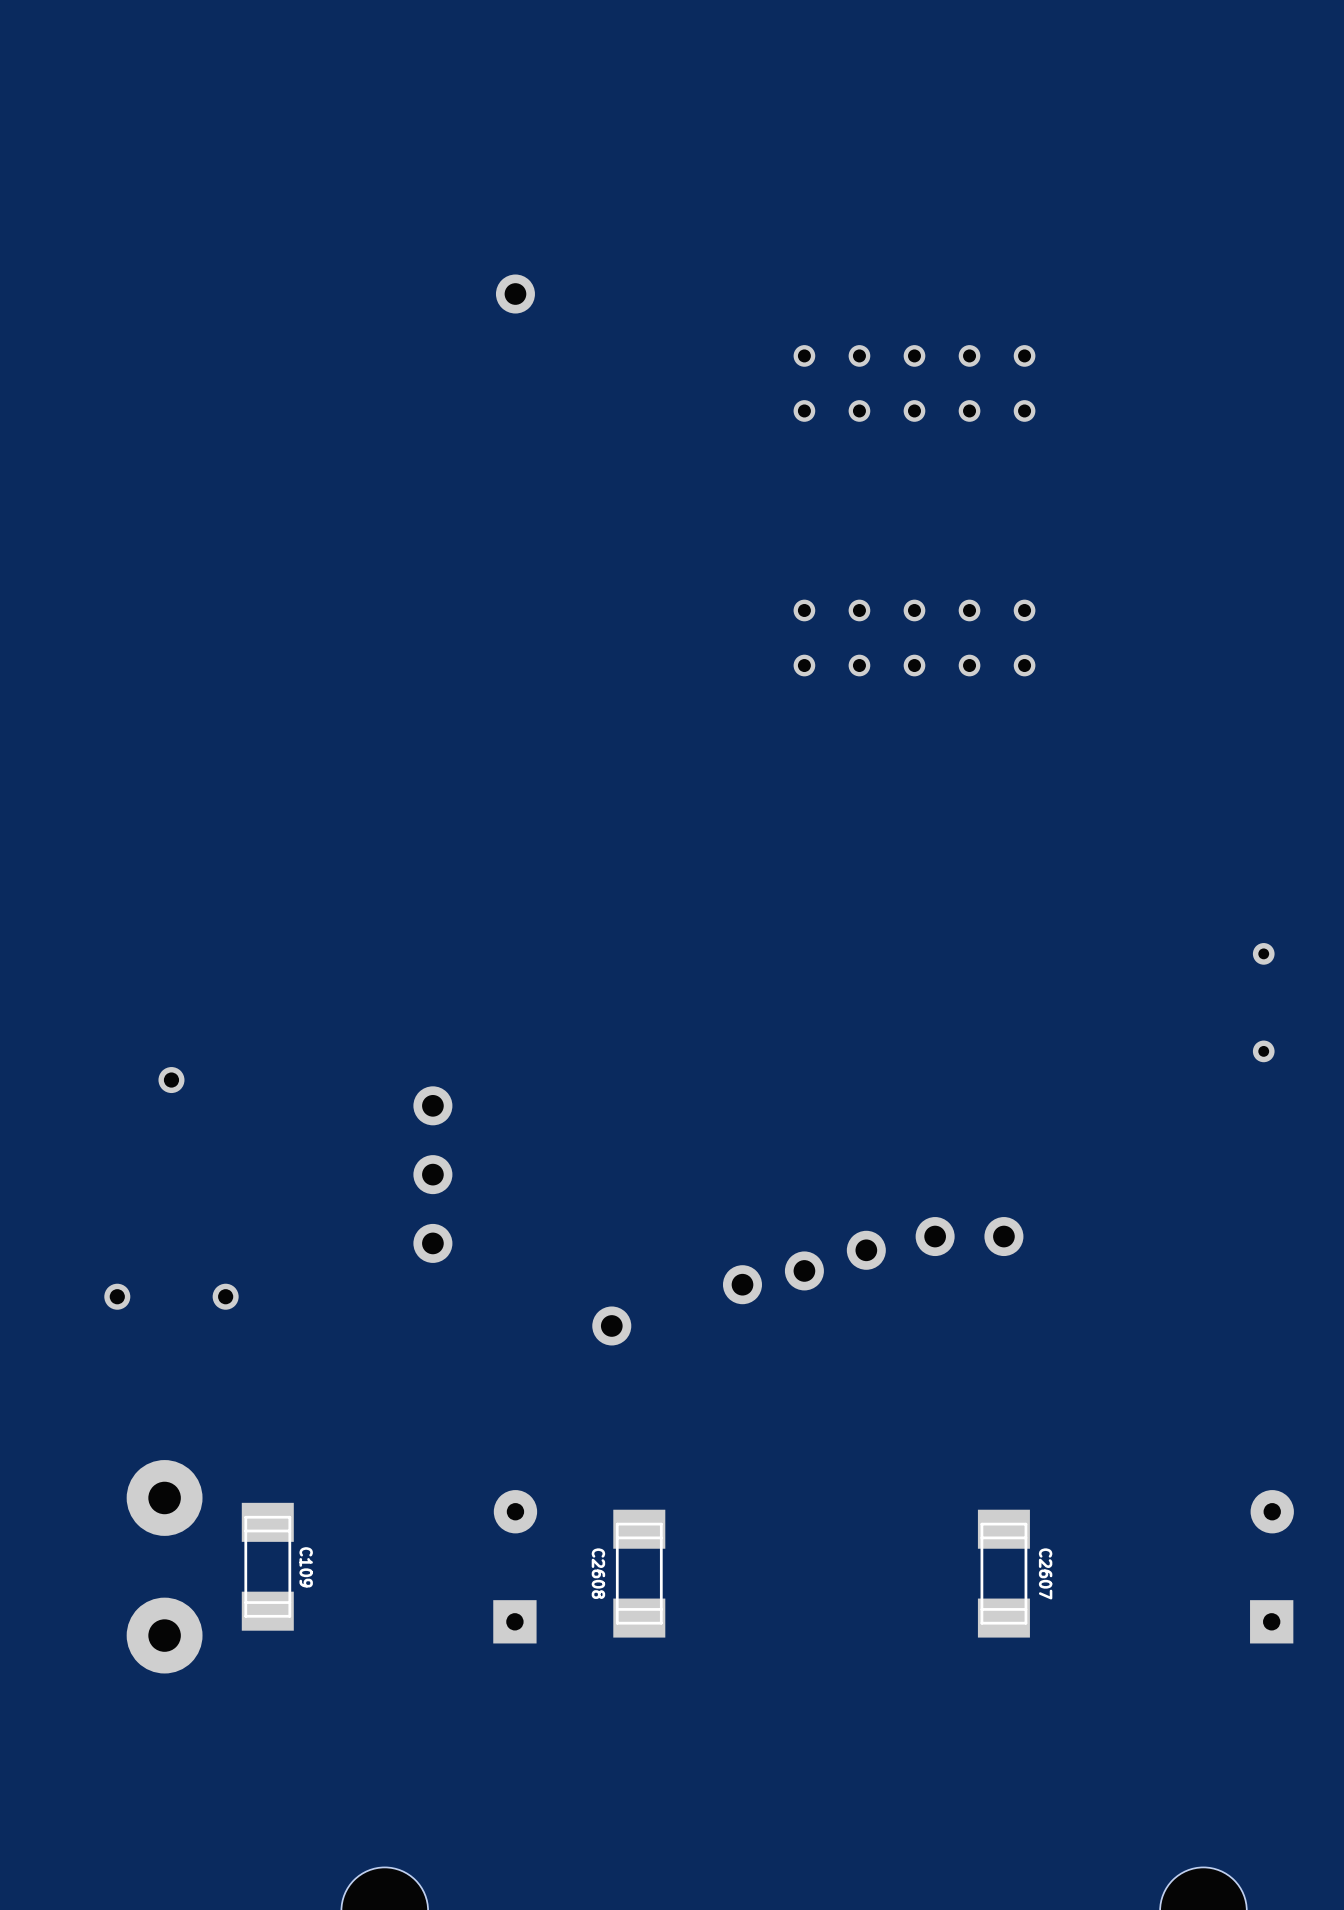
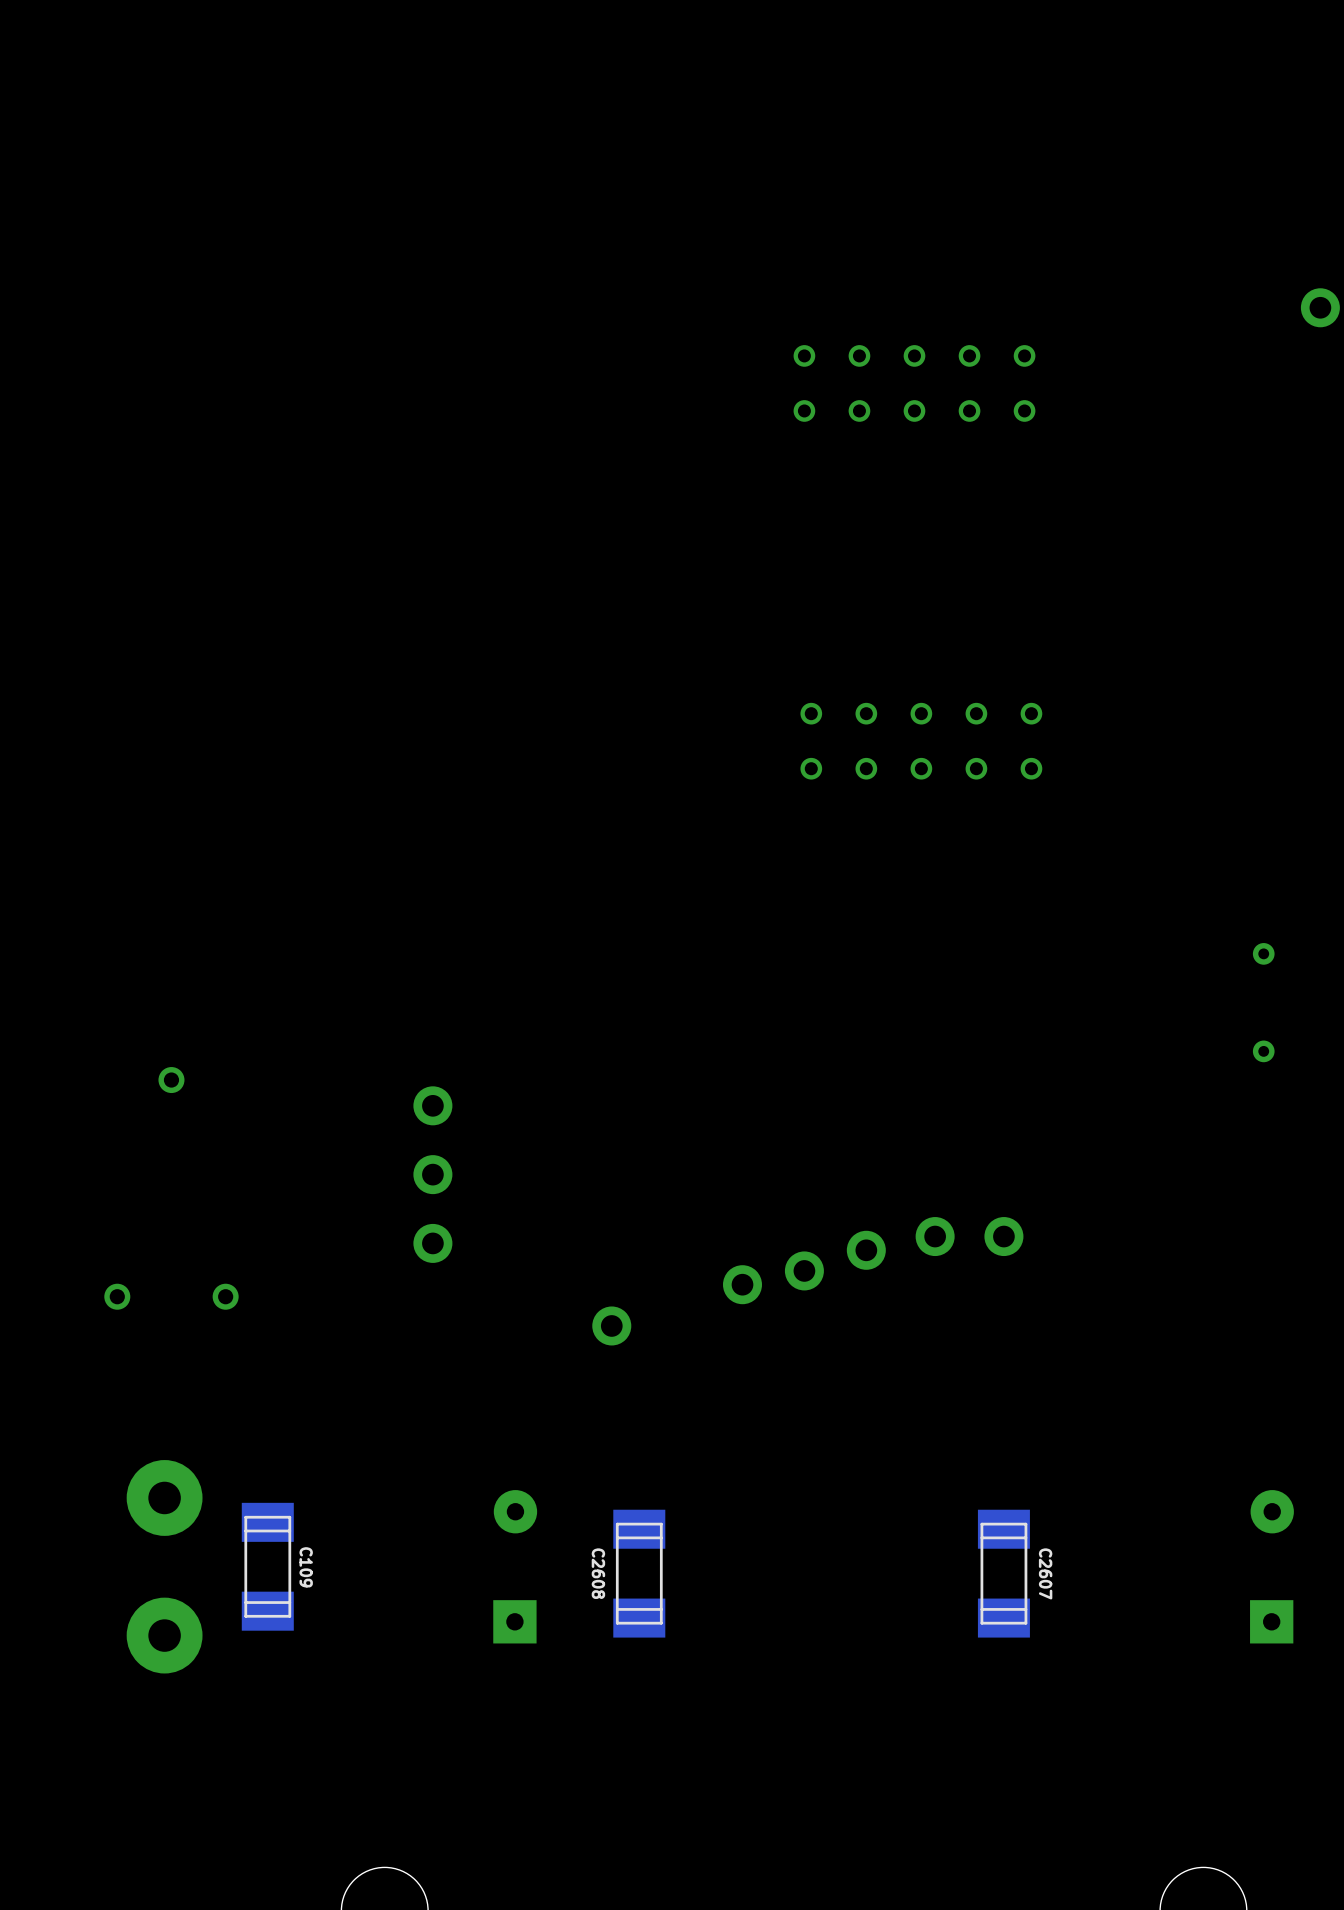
part: (515, 294) -> none
part: none -> (1320, 307)
part position: (914, 638) -> (921, 741)

